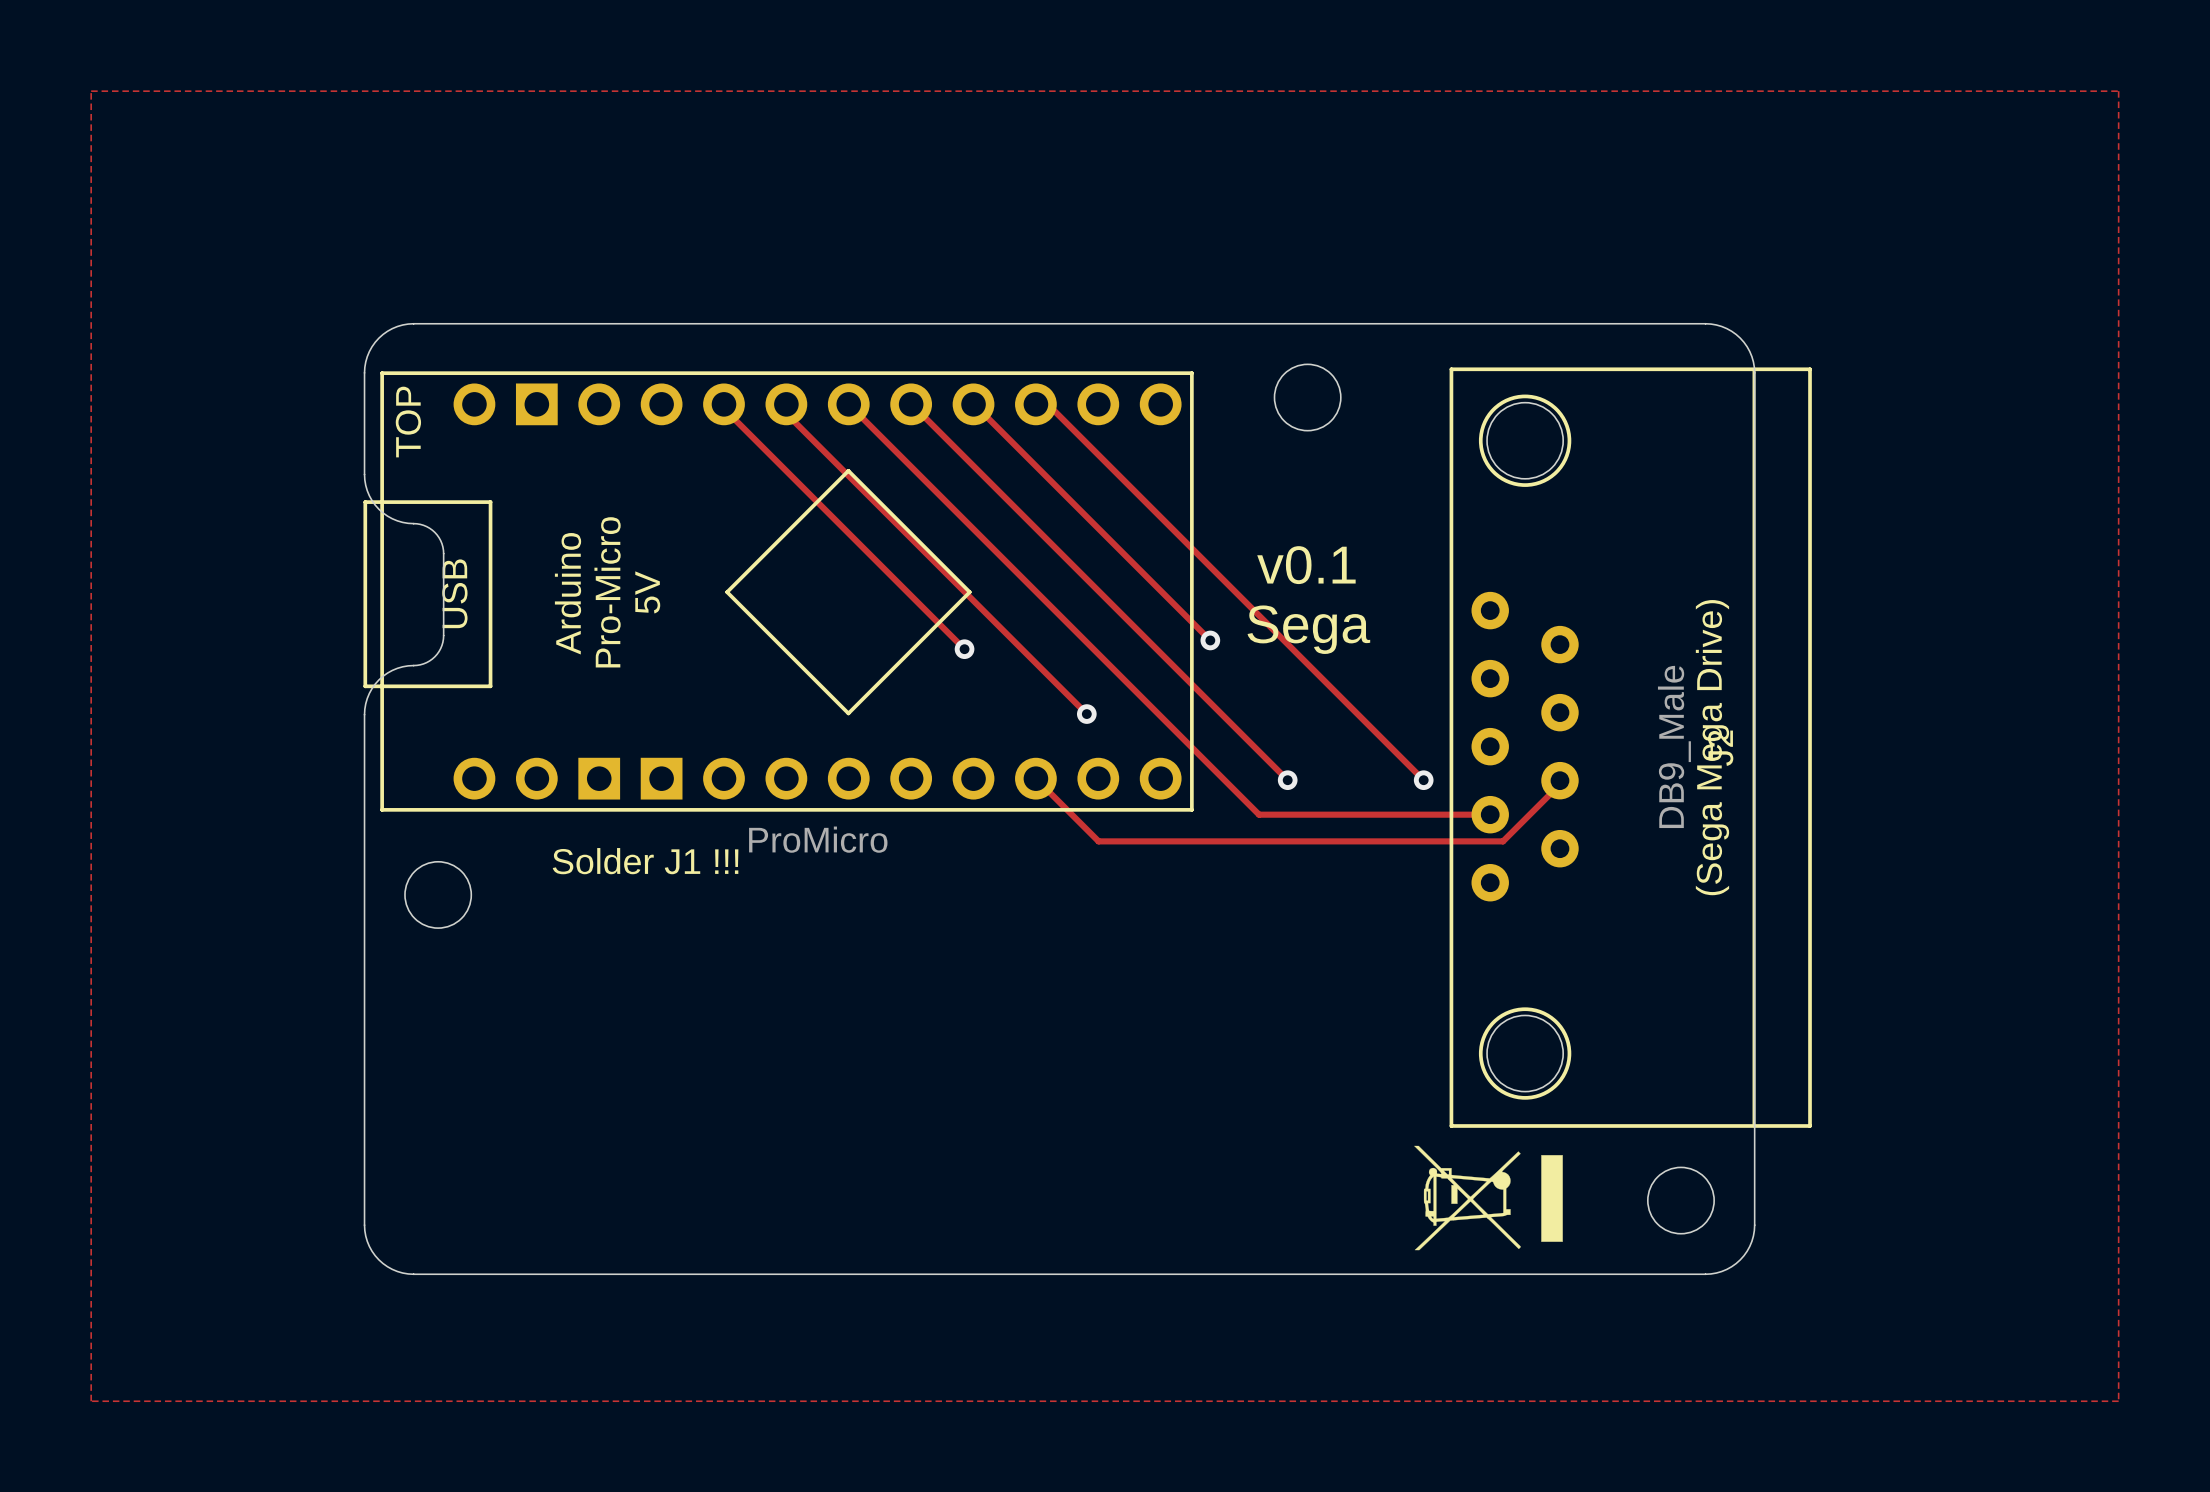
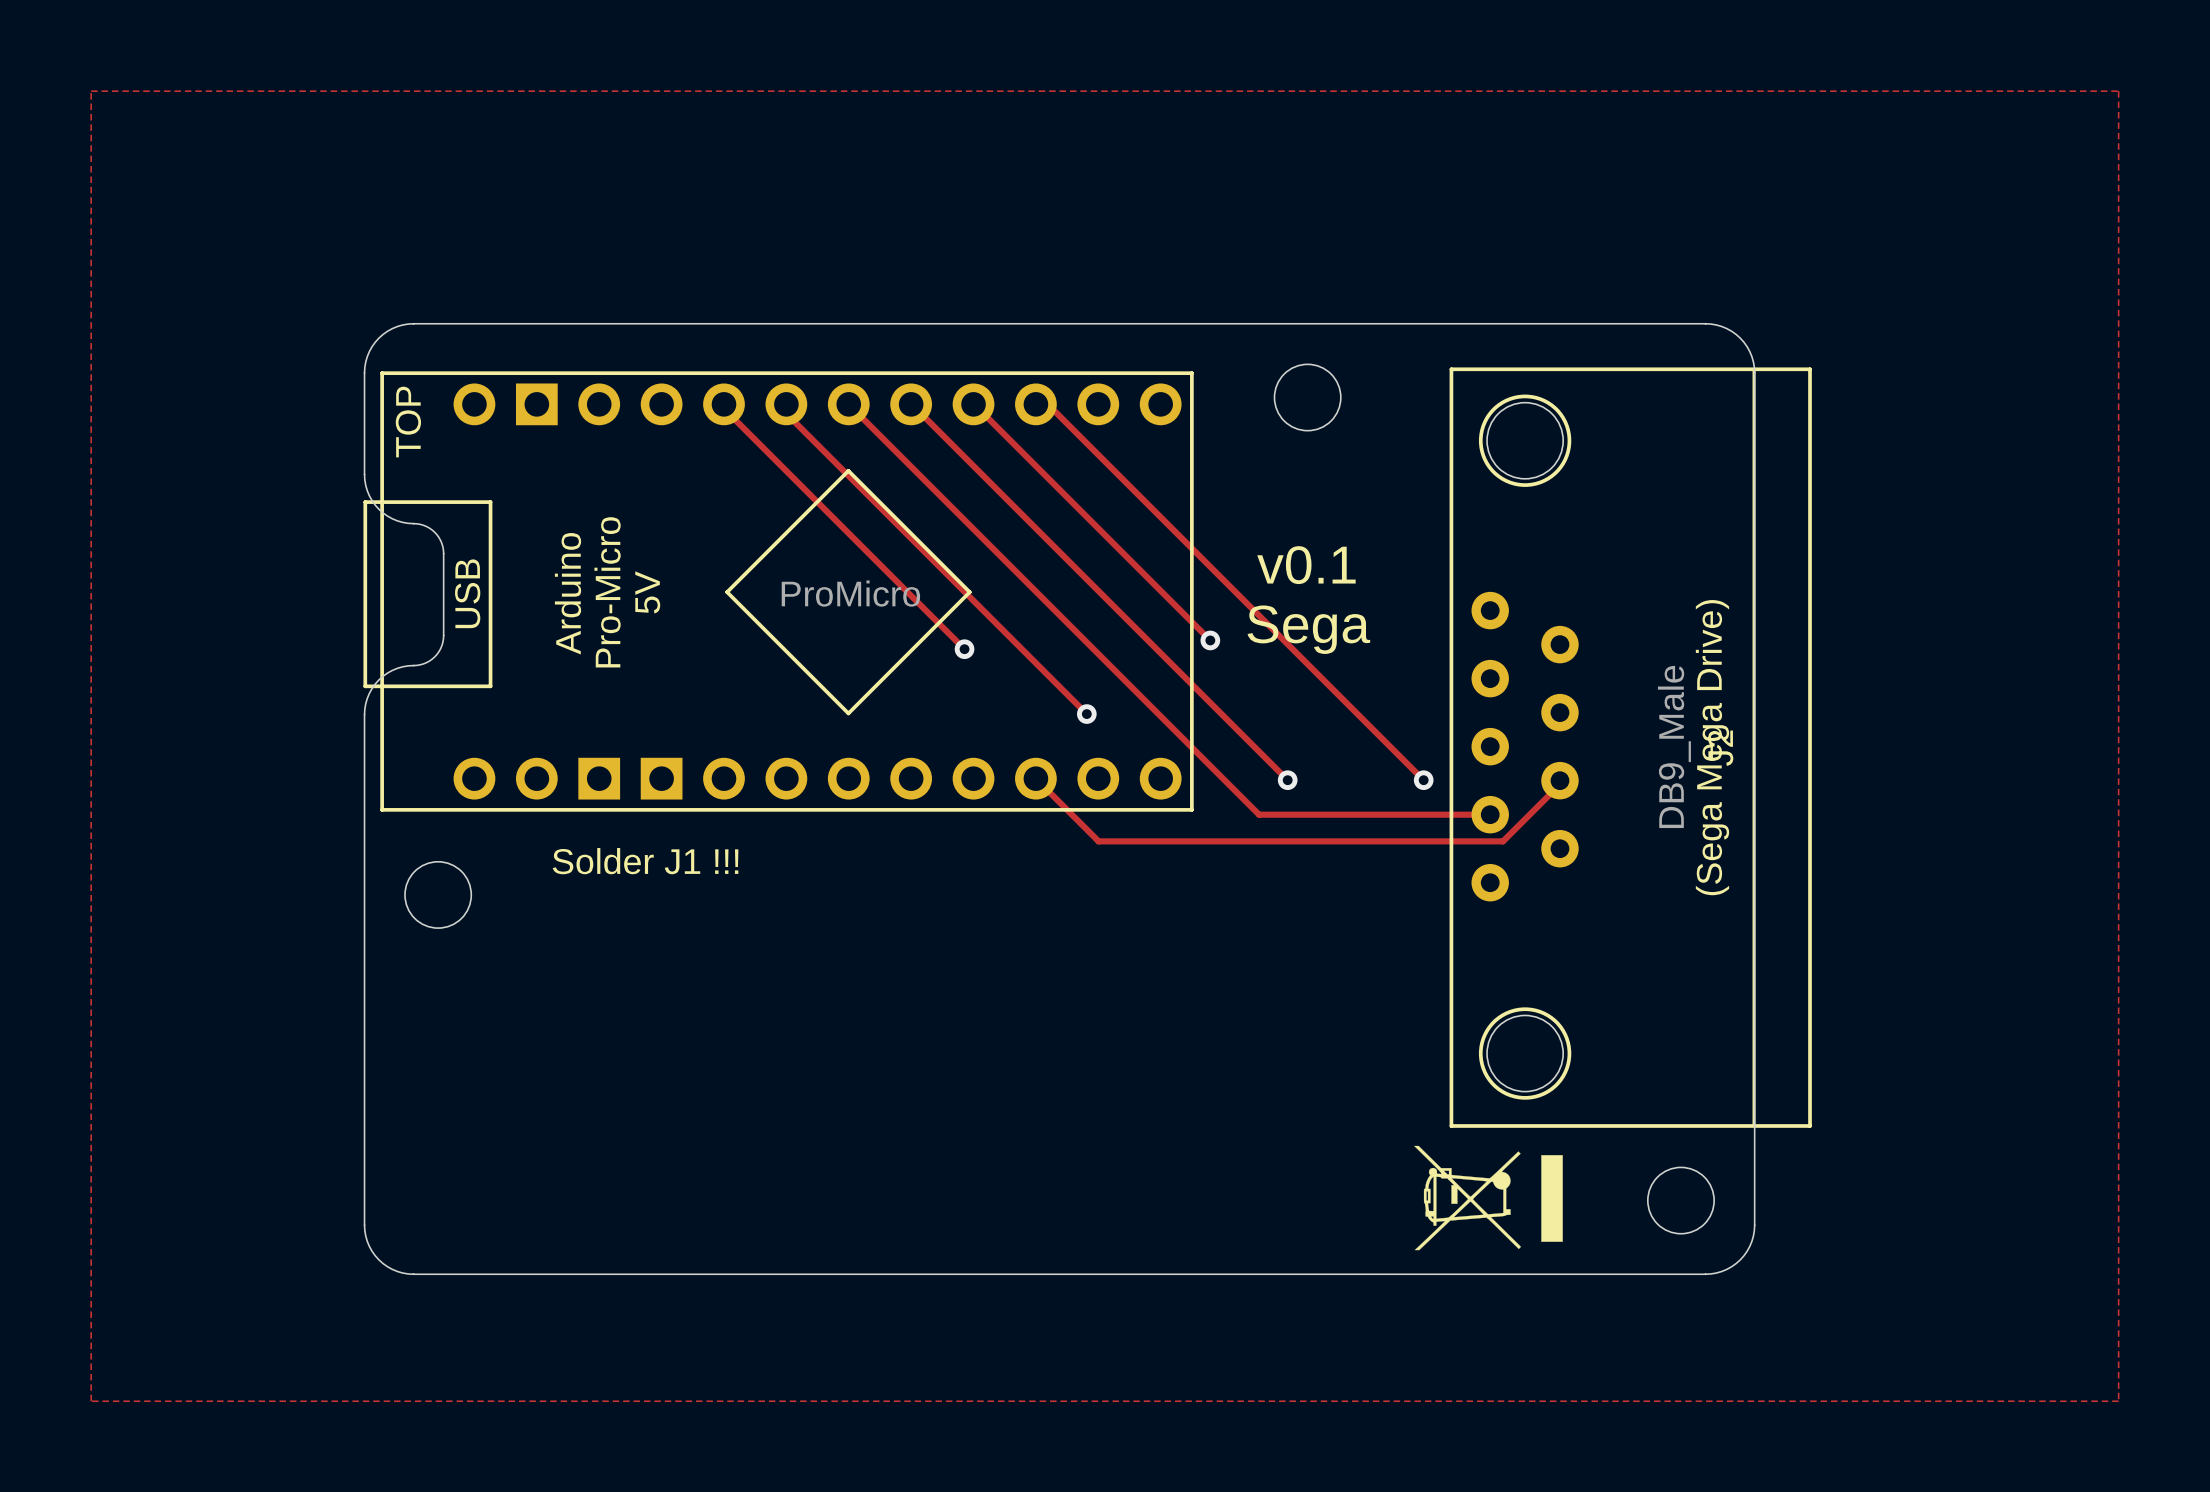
part text position: USB (454, 593) -> USB (467, 593)
part value position: ProMicro (818, 839) -> ProMicro (850, 593)

